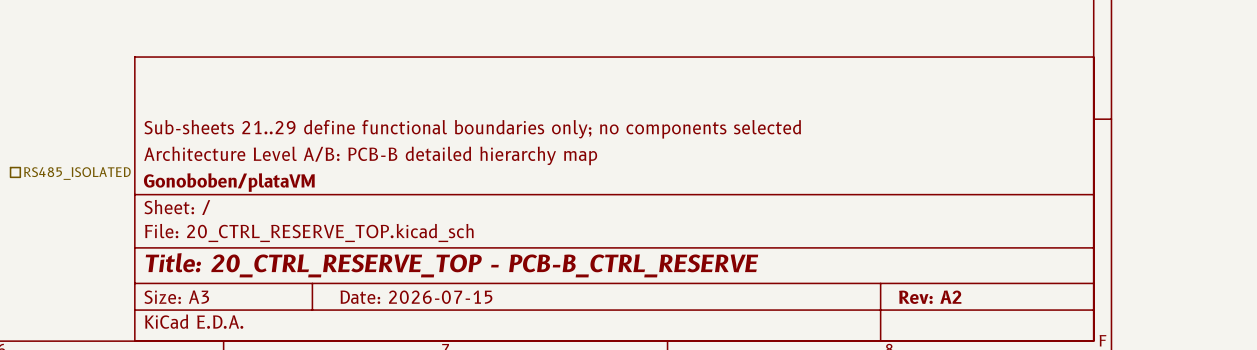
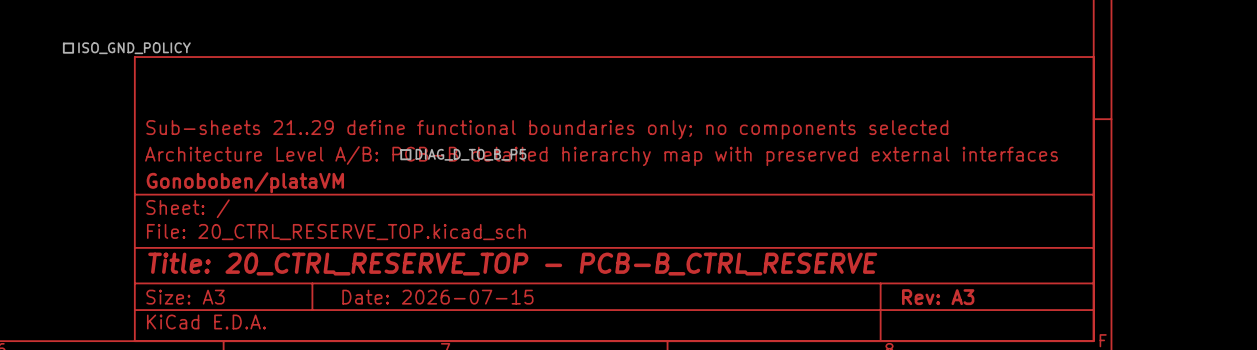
hierarchical label: none -> ISO_GND_POLICY (134, 48)
title block: Architecture Level A/B: PCB-B detailed hierarchy map (370, 155) -> Architecture Level A/B: PCB-B detailed hierarchy map with preserved external interfaces (601, 156)
hierarchical label: none -> DIAG_D_TO_B_P5 (470, 154)
hierarchical label: RS485_ISOLATED (77, 173) -> none
title block: Rev: A2 (930, 297) -> Rev: A3 (938, 297)

